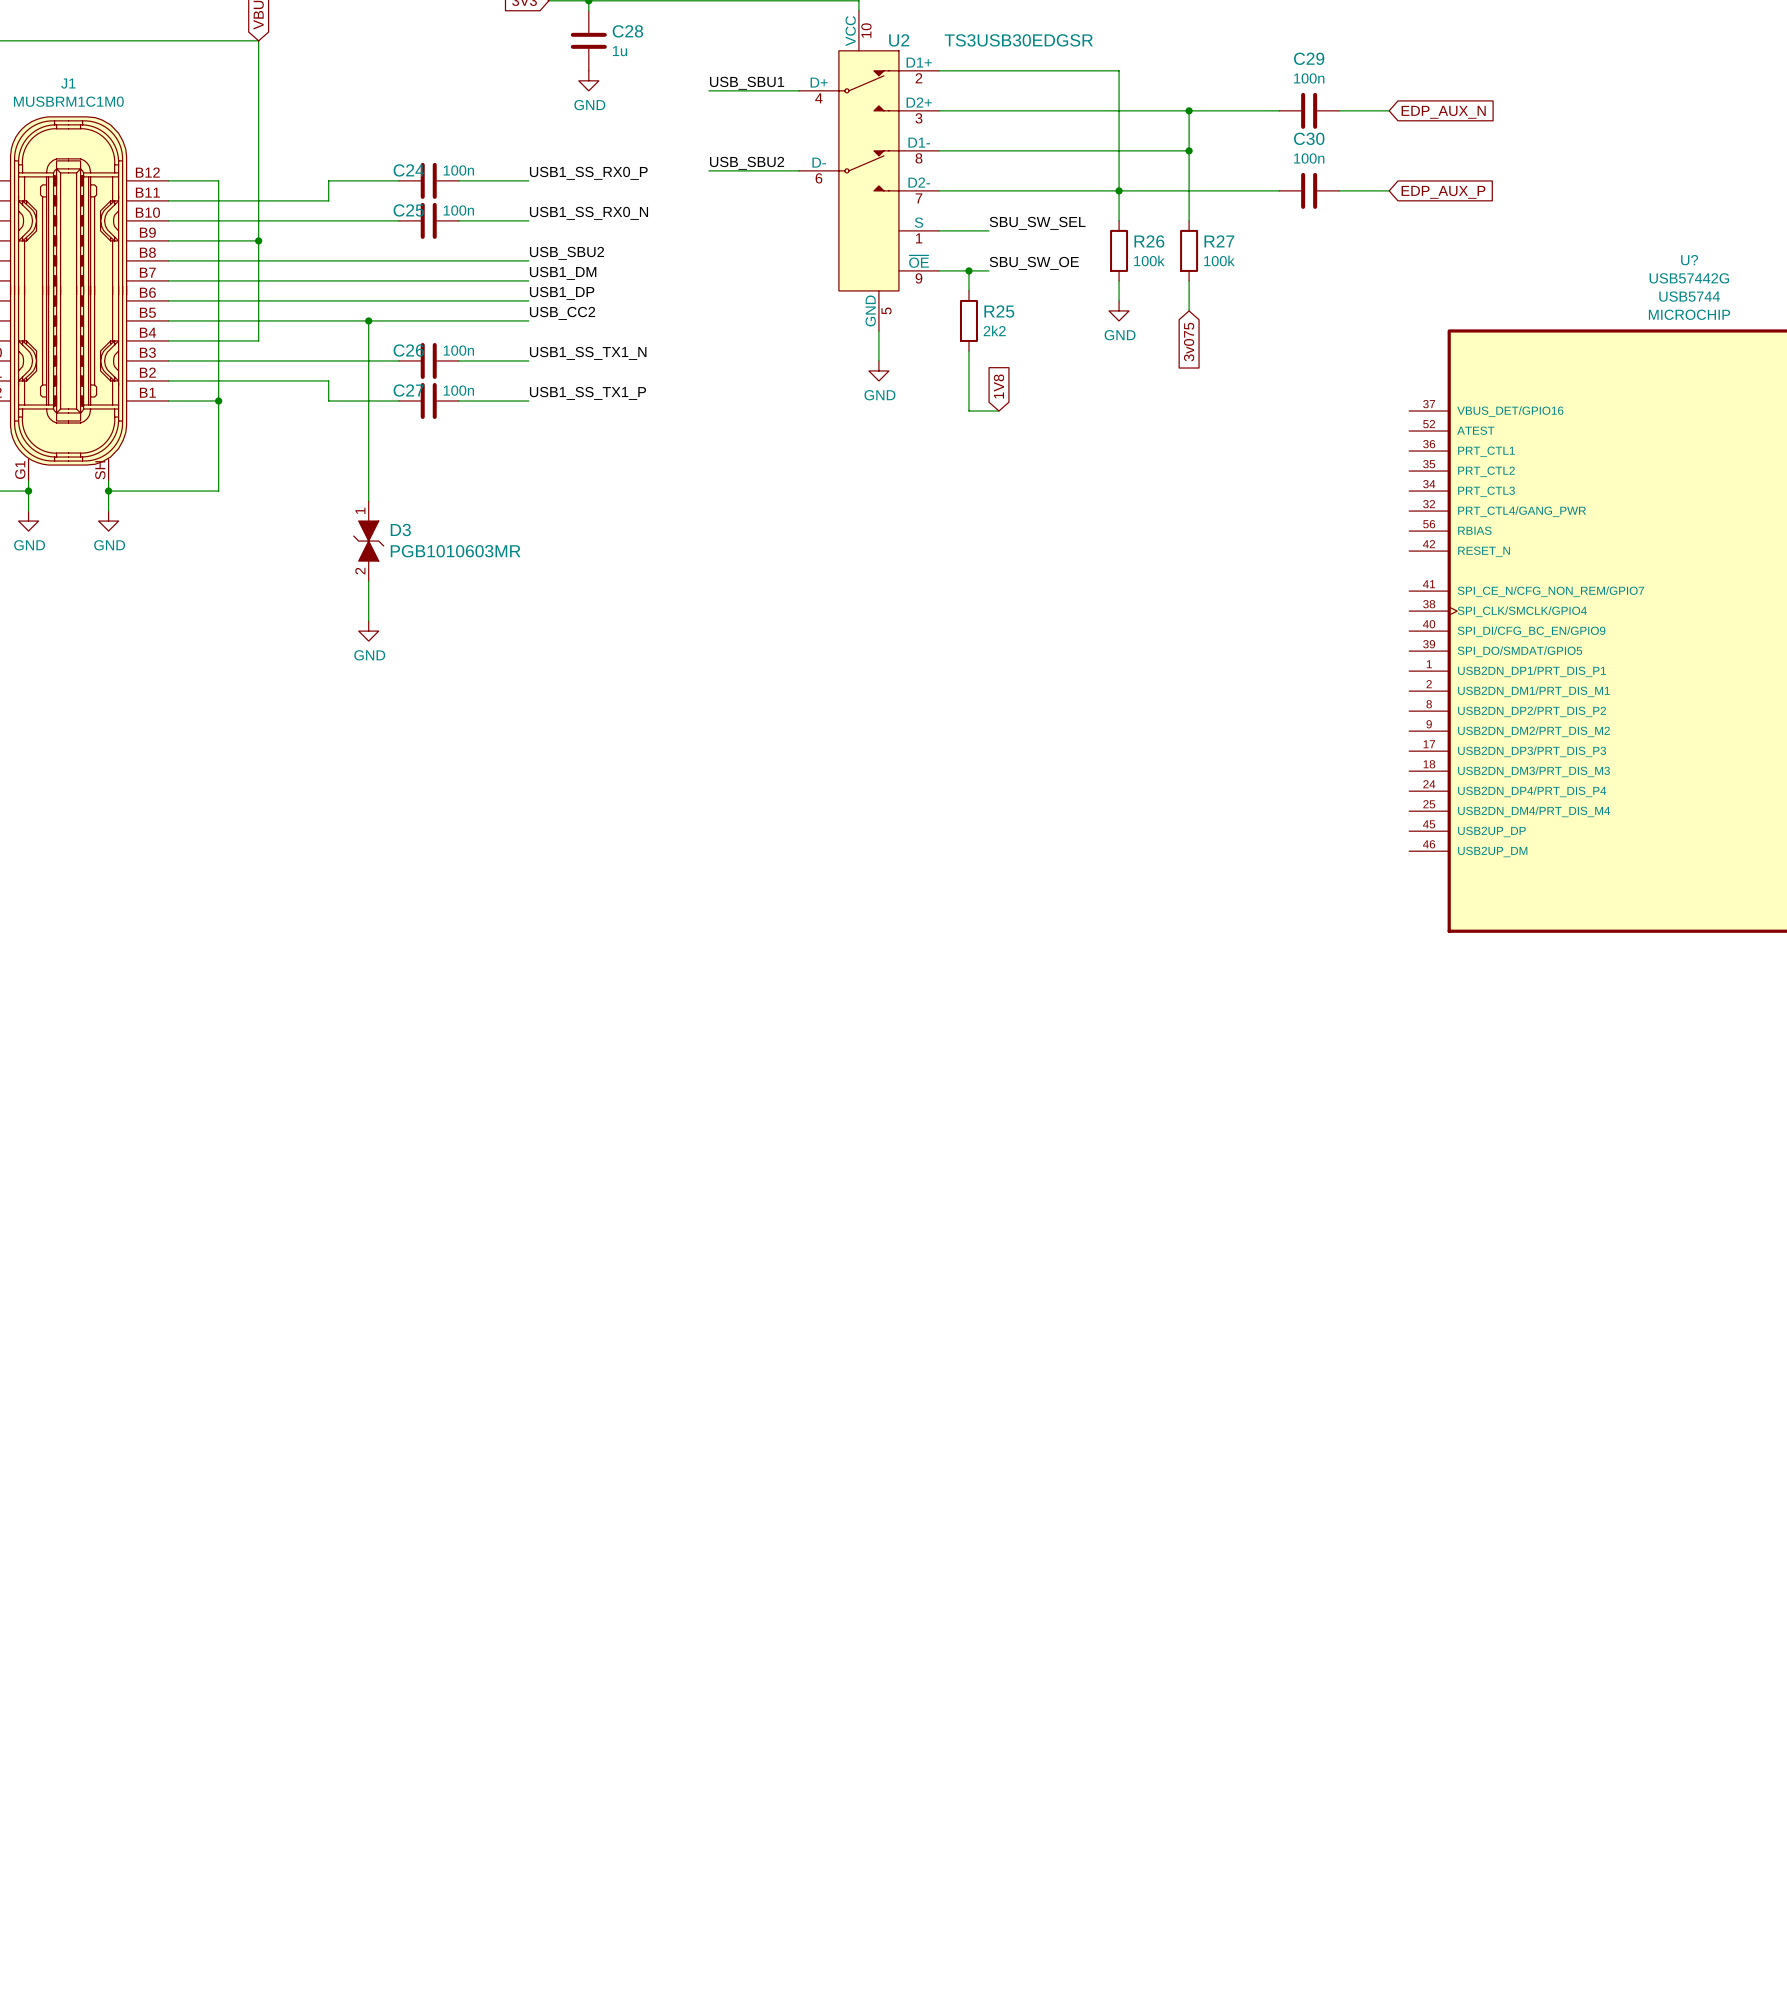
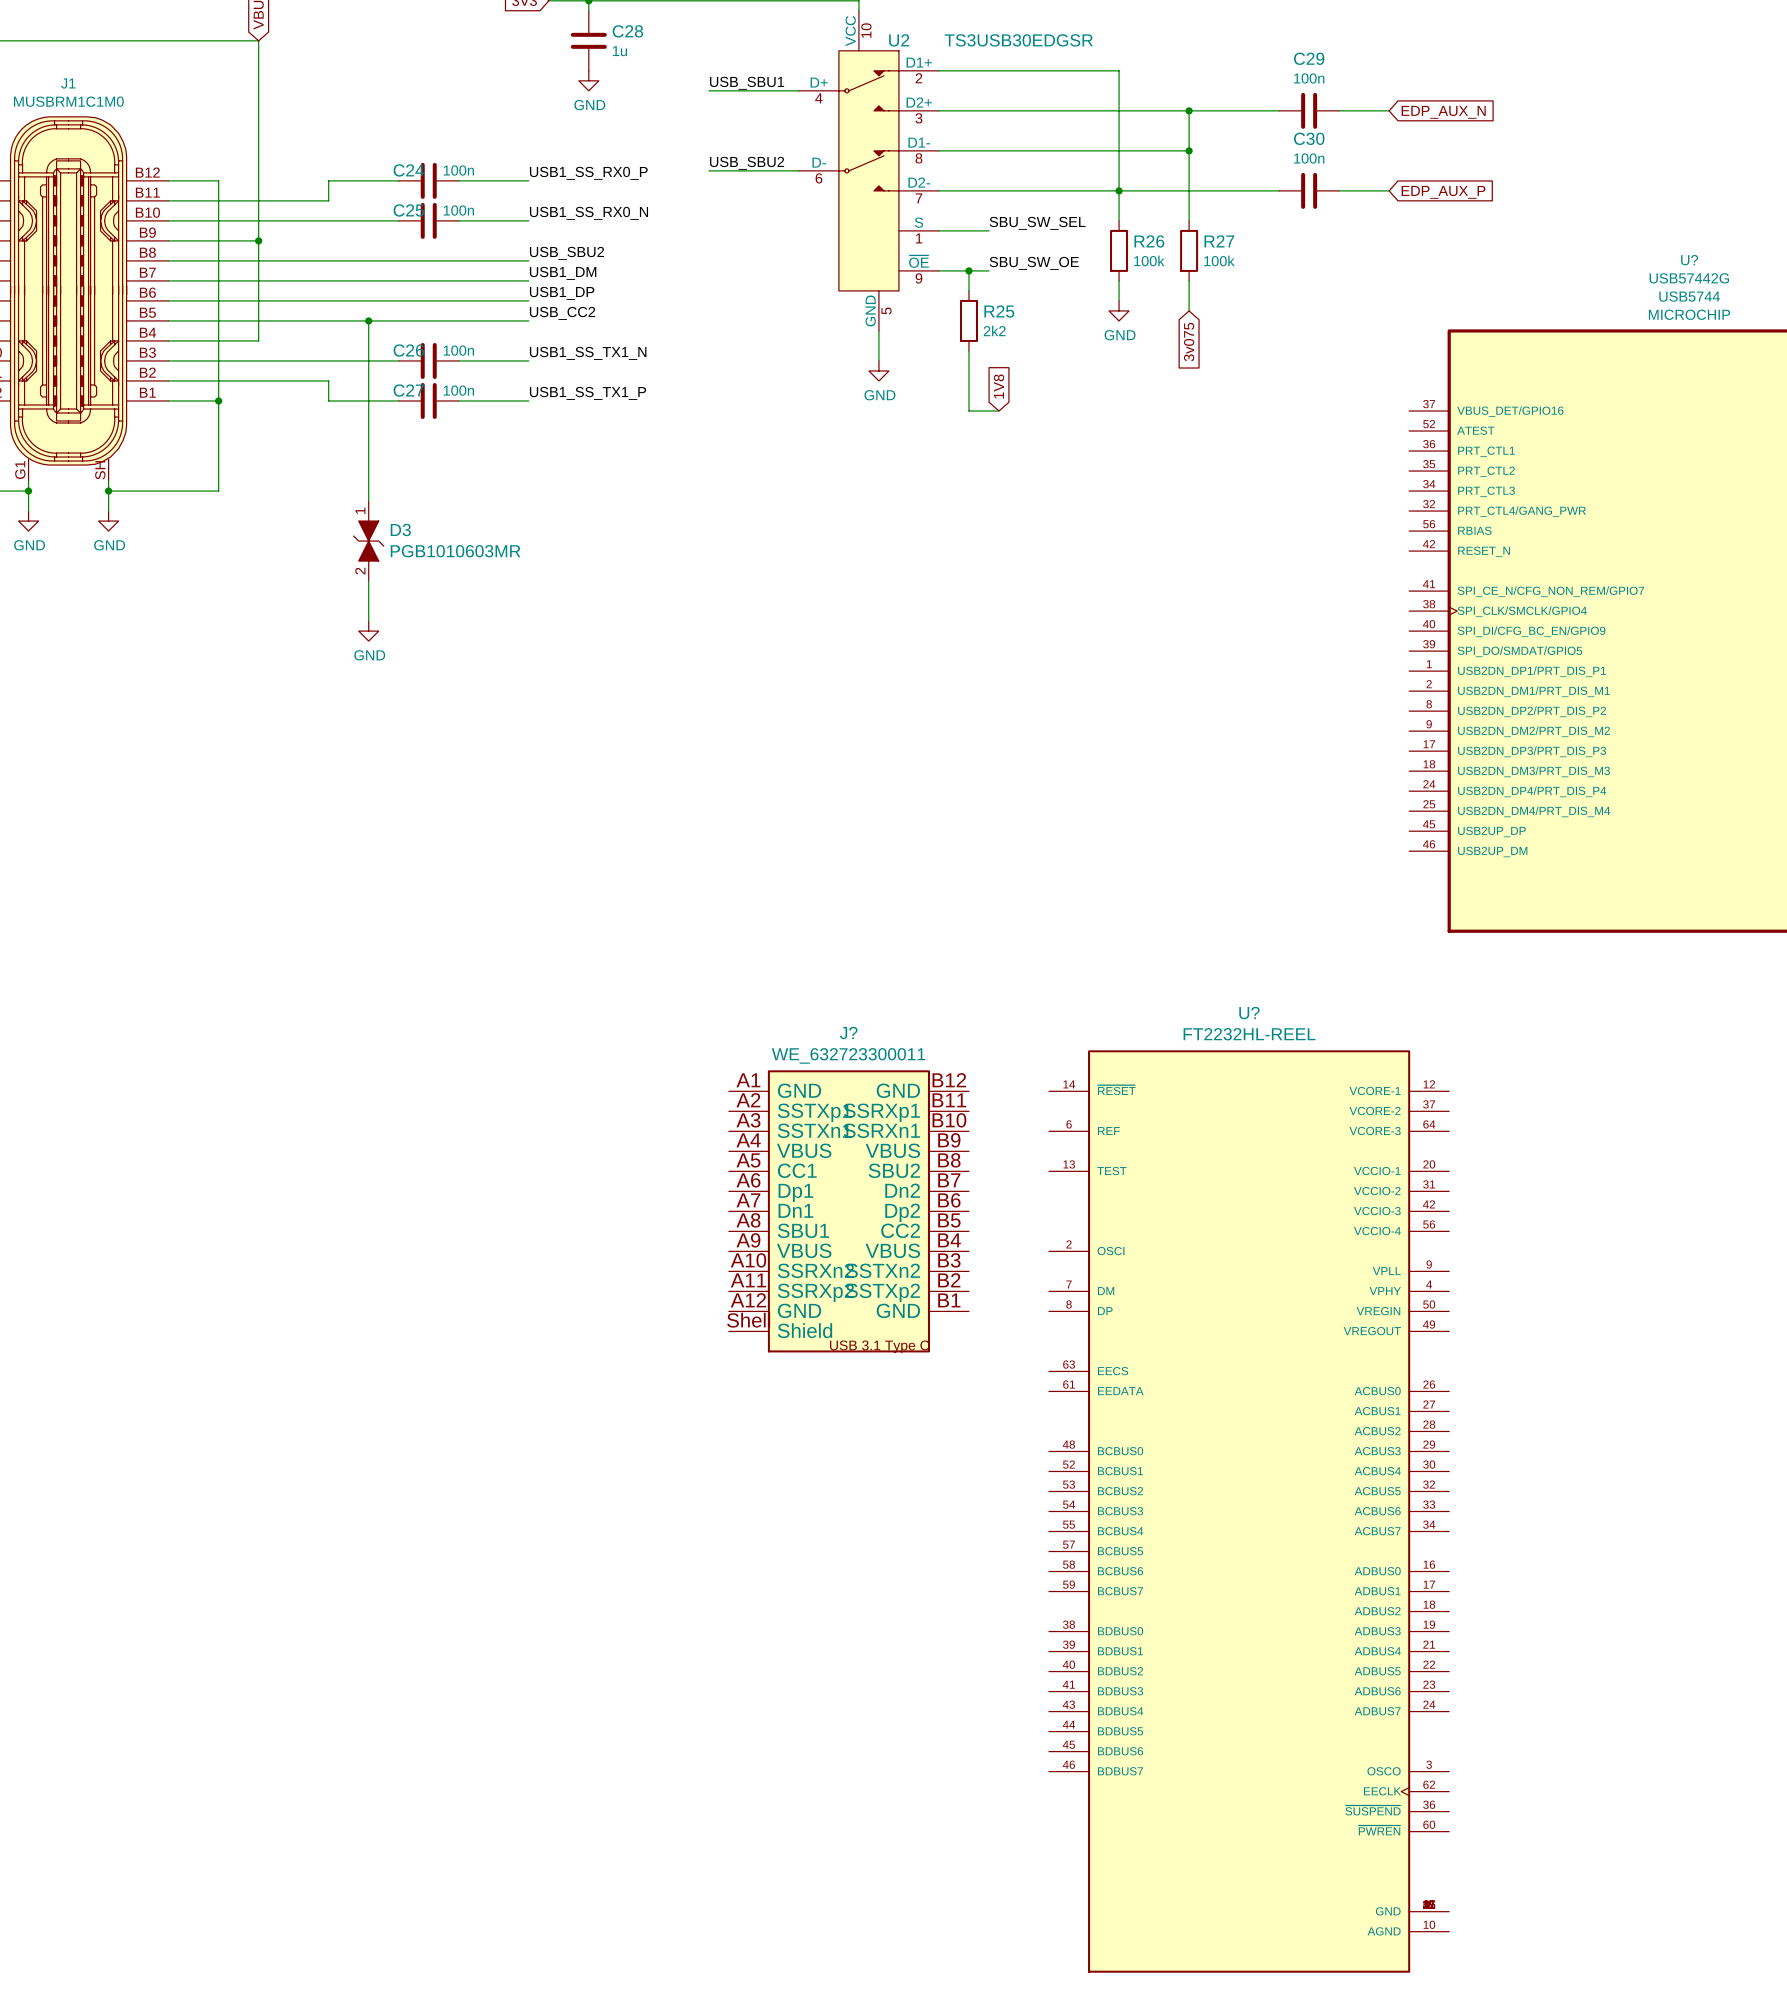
J?: none -> WE_632723300011 (848, 1211)
U?: none -> FT2232HL-REEL (1249, 1511)

